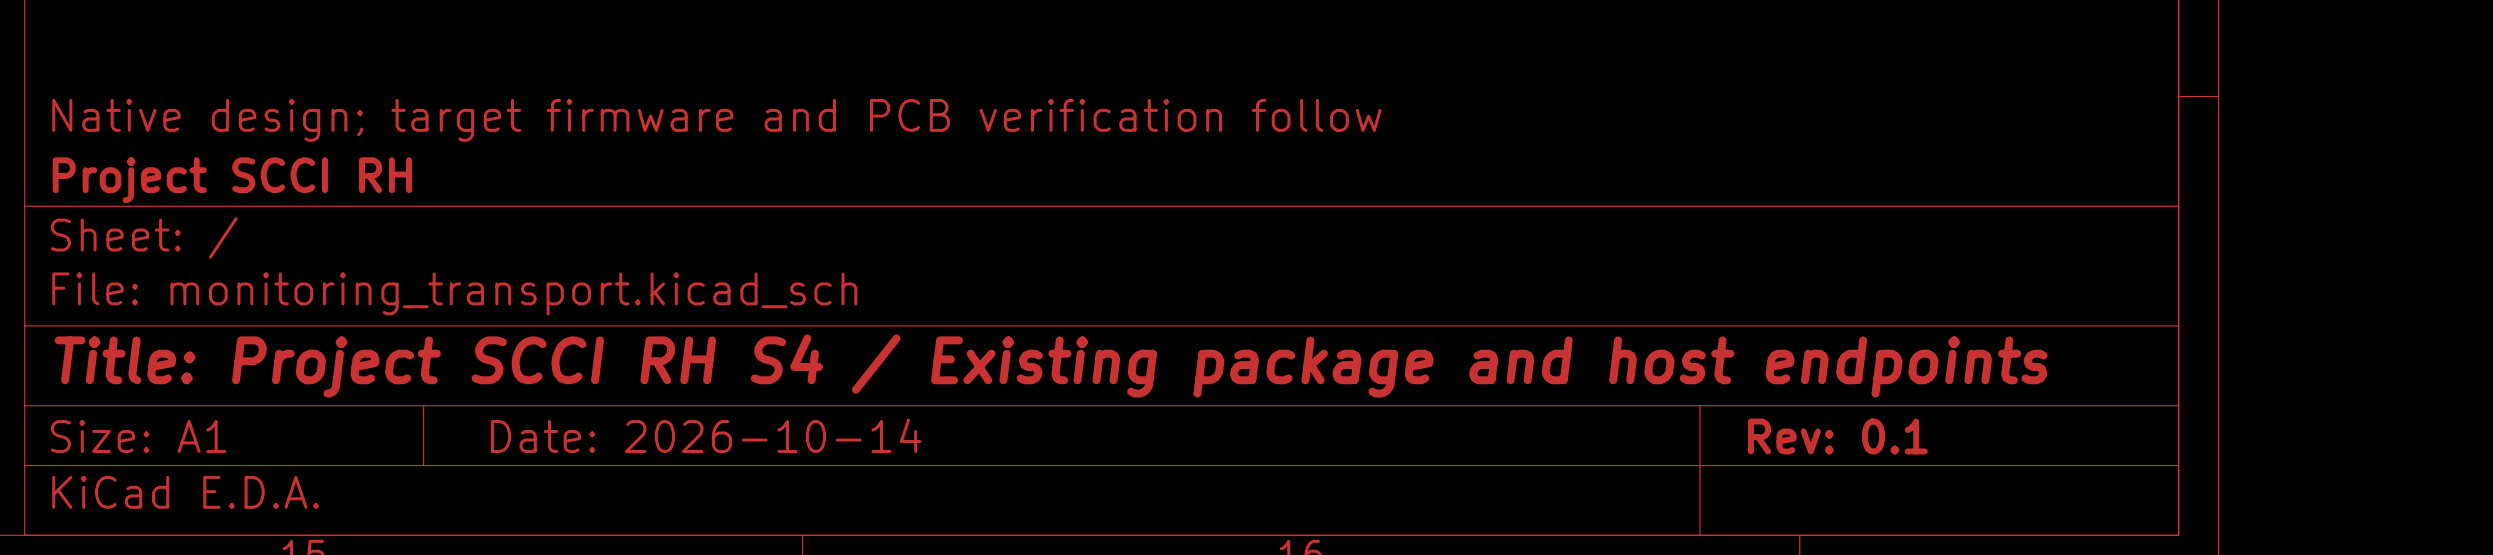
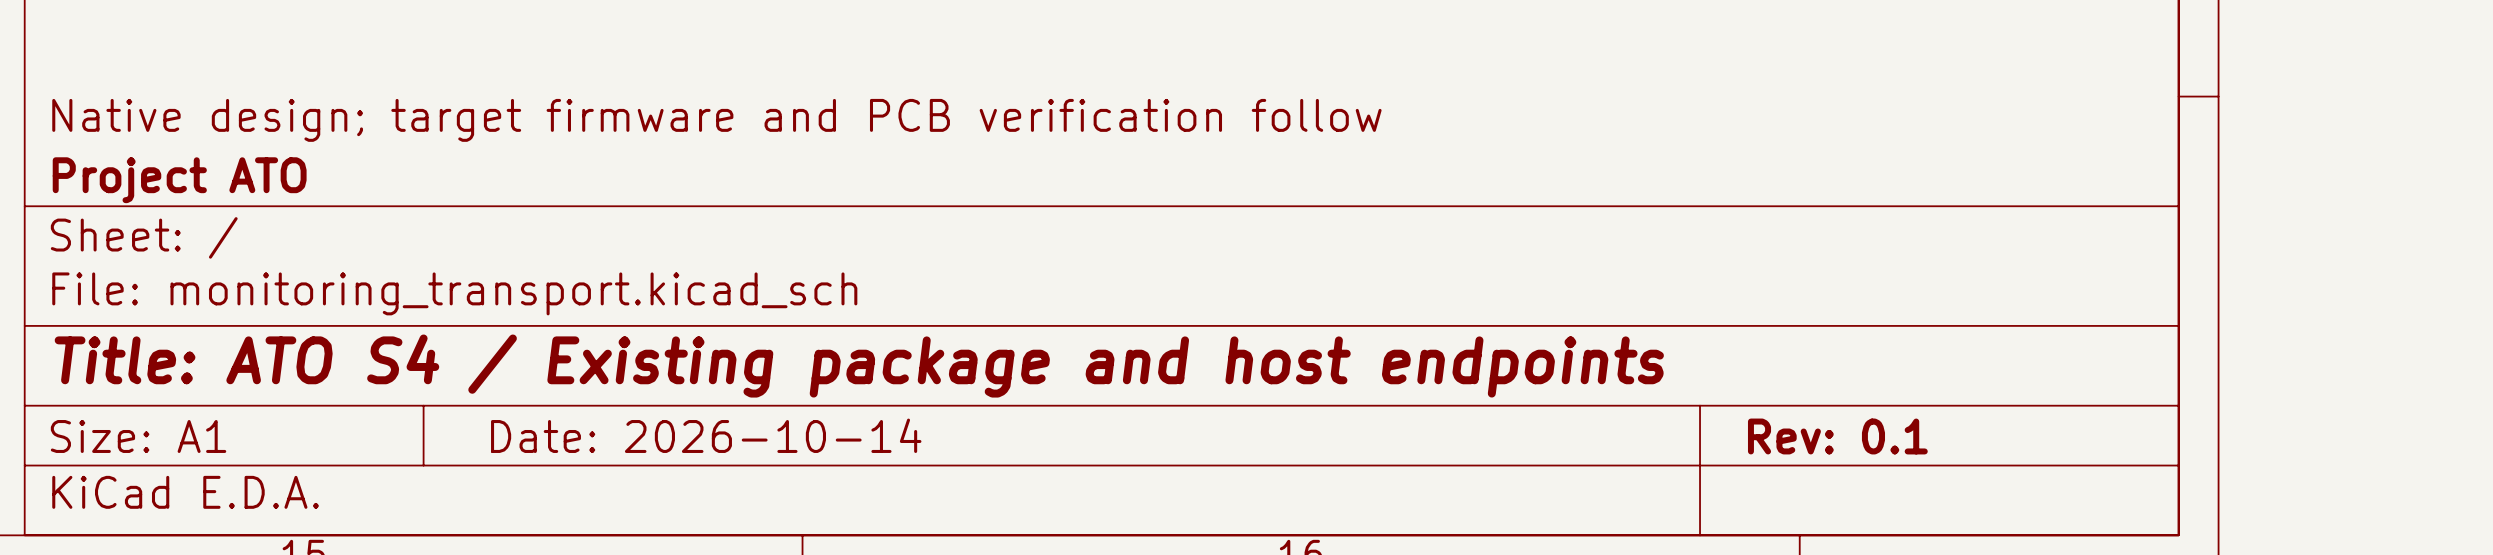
title block: Project SCCI RH (232, 180) -> Project ATO (179, 180)
title block: Title: Project SCCI RH S4 / Existing package and host endpoints (1051, 366) -> Title: ATO S4 / Existing package and host endpoints (859, 366)

